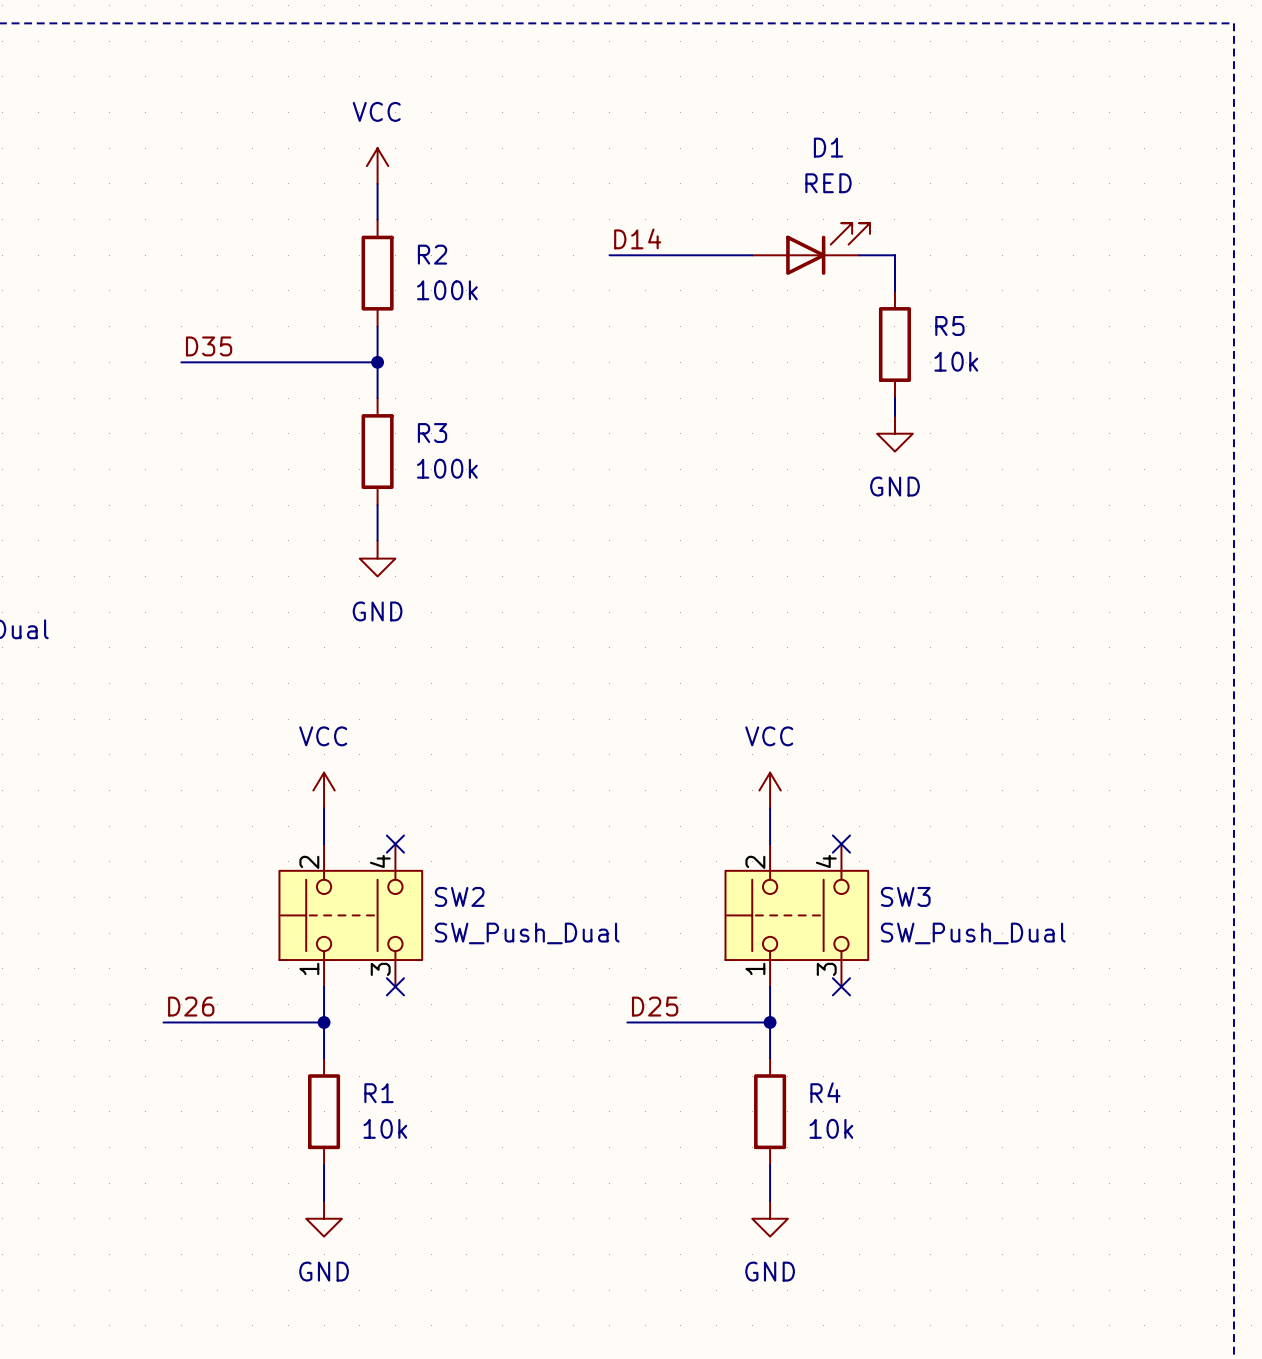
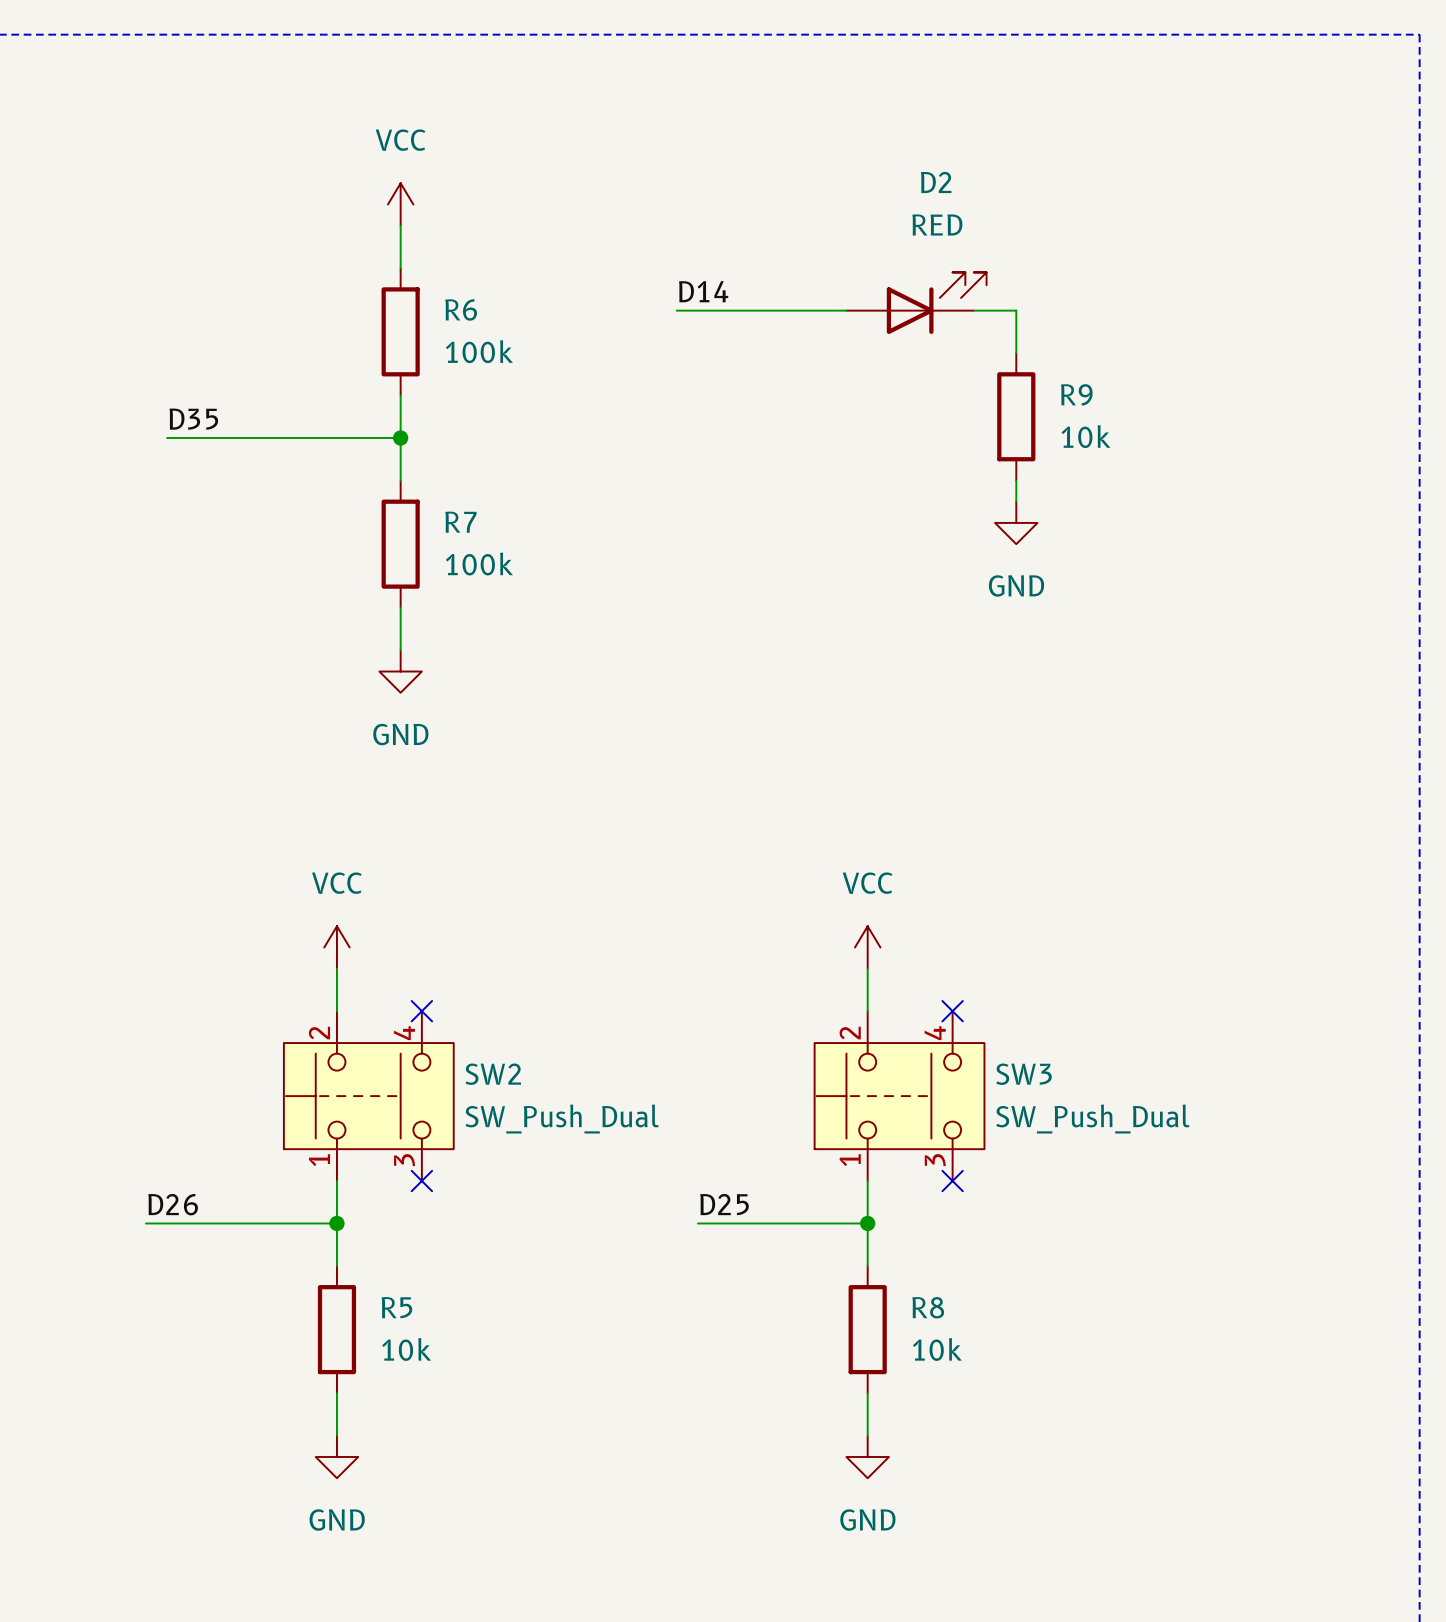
D1 name: D1 (828, 147) -> D2 (936, 182)
R2 name: R2 (432, 254) -> R6 (461, 309)
R5 name: R5 (949, 325) -> R9 (1076, 394)
R3 name: R3 (432, 433) -> R7 (460, 522)
R4 name: R4 (825, 1092) -> R8 (928, 1307)
R1 name: R1 (378, 1093) -> R5 (396, 1307)

